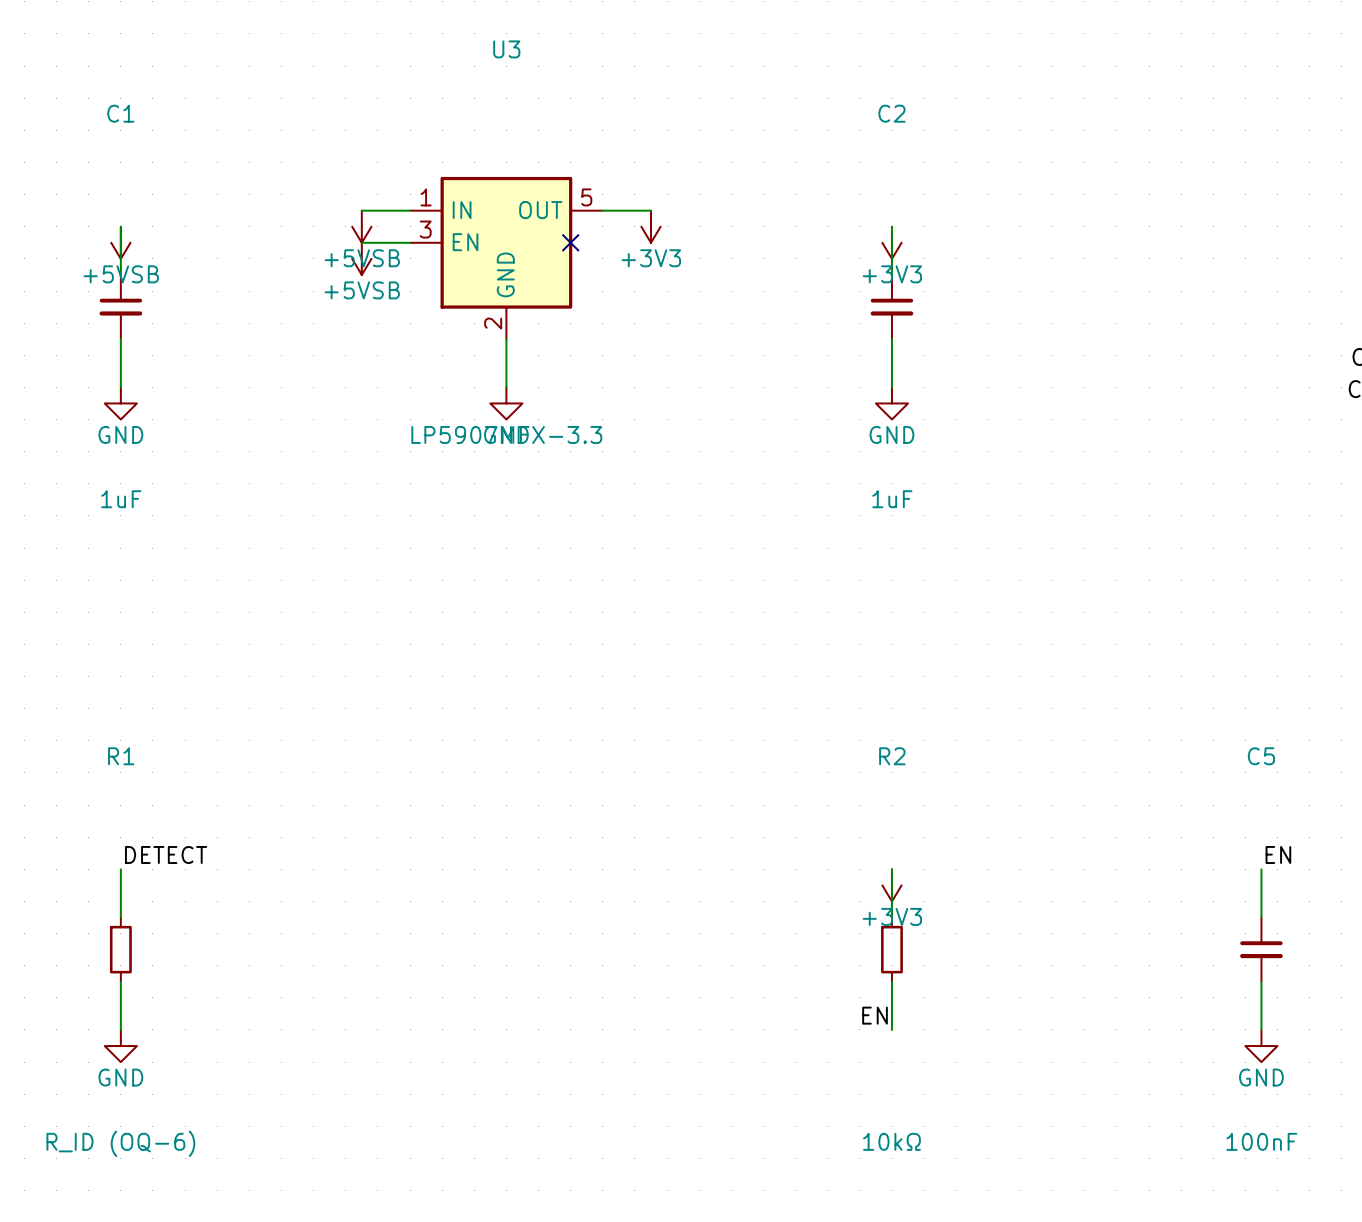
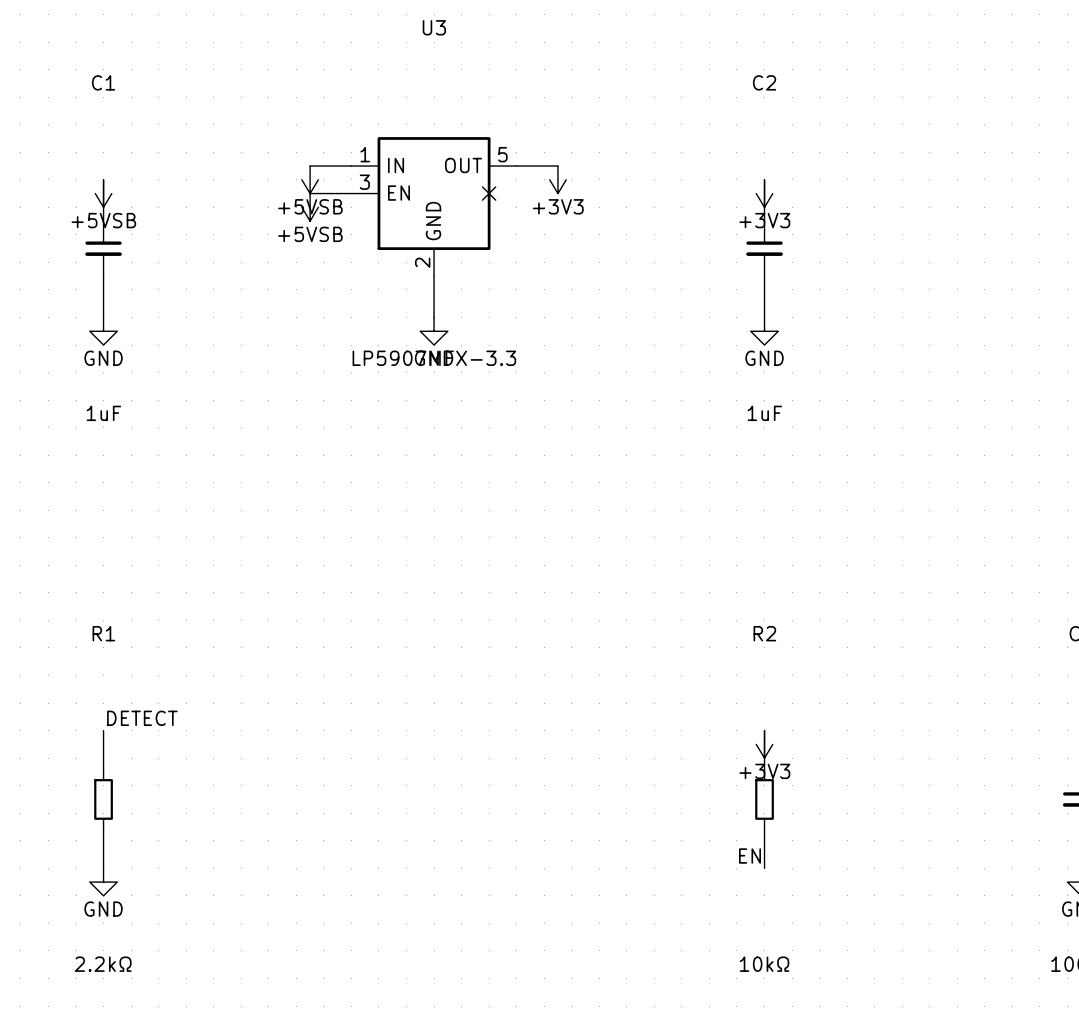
R1 value: R_ID (OQ-6) (120, 1143) -> 2.2kΩ (103, 964)

